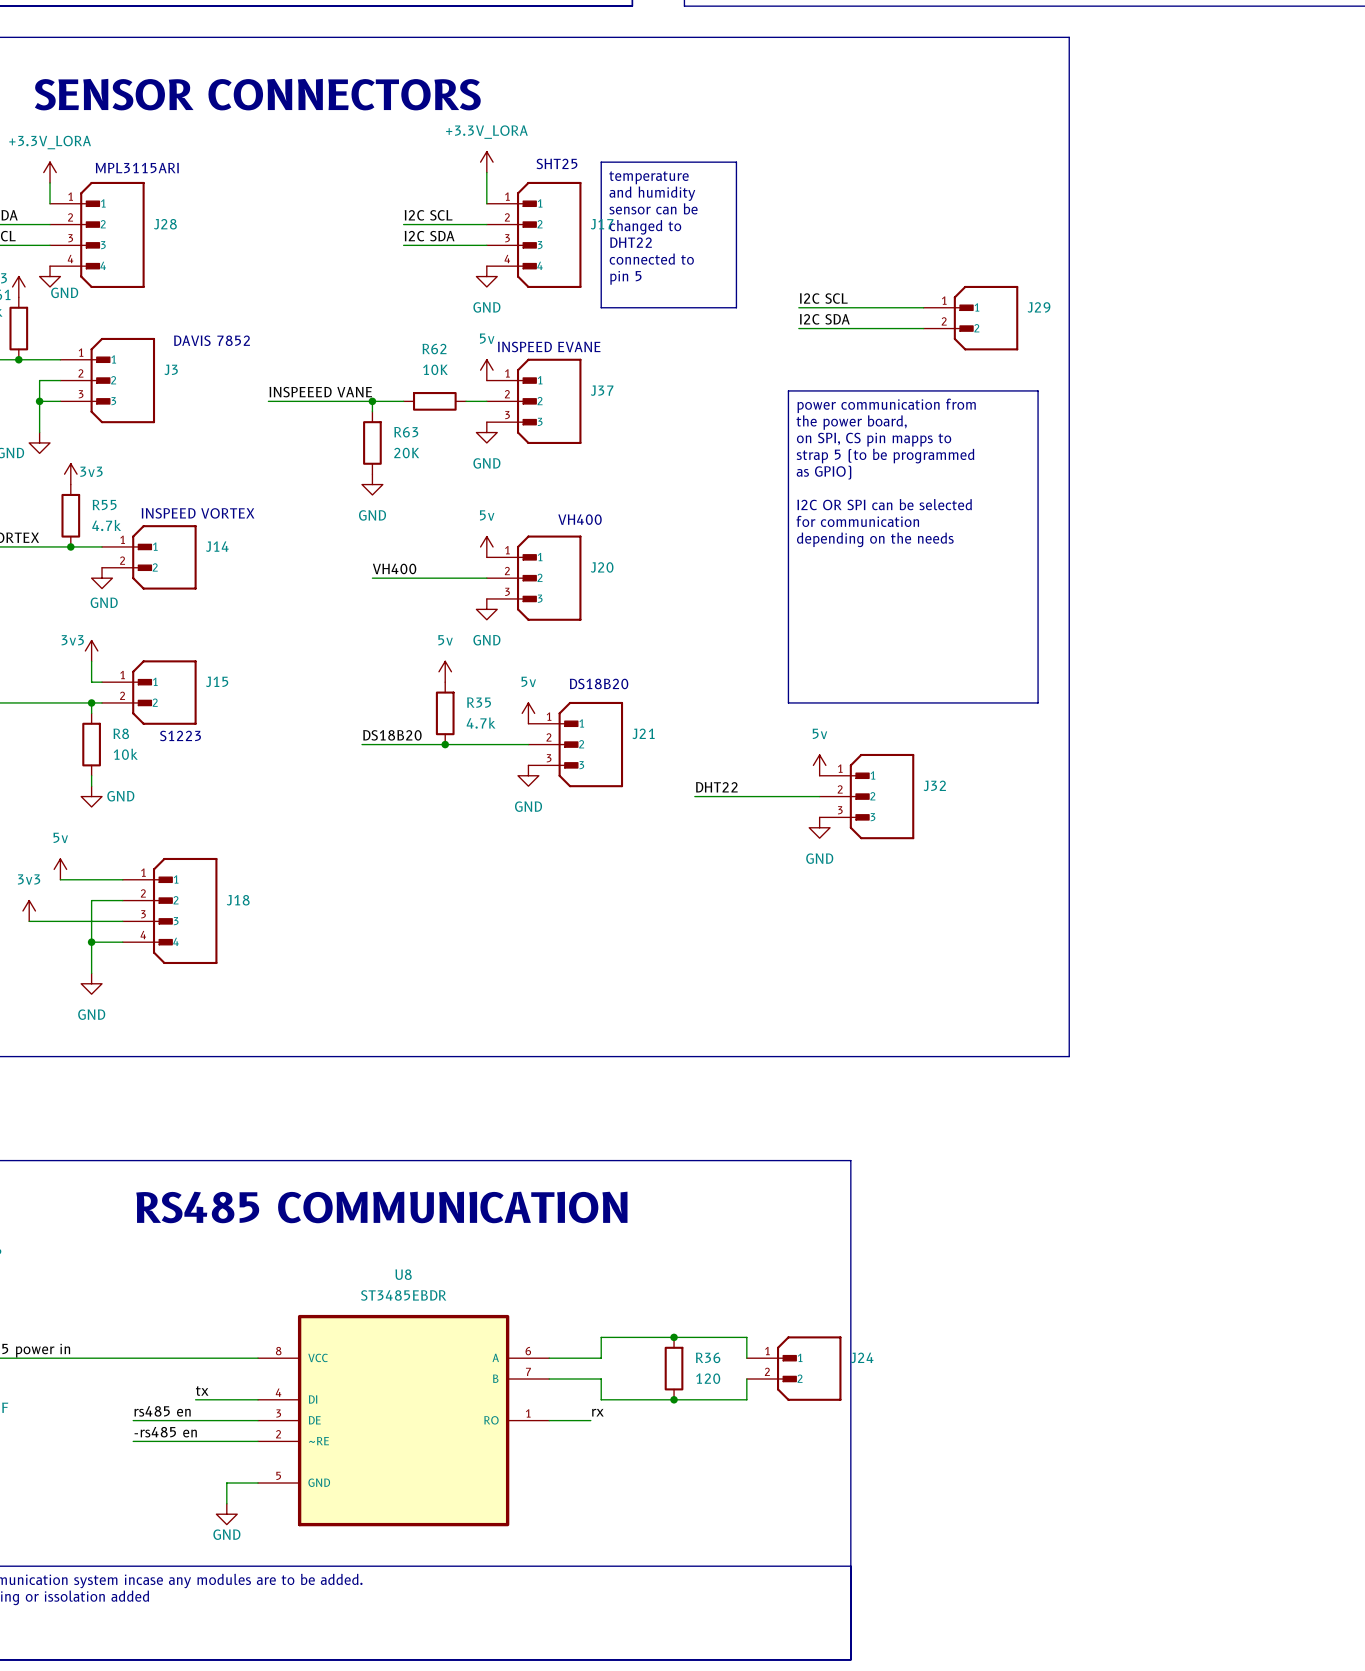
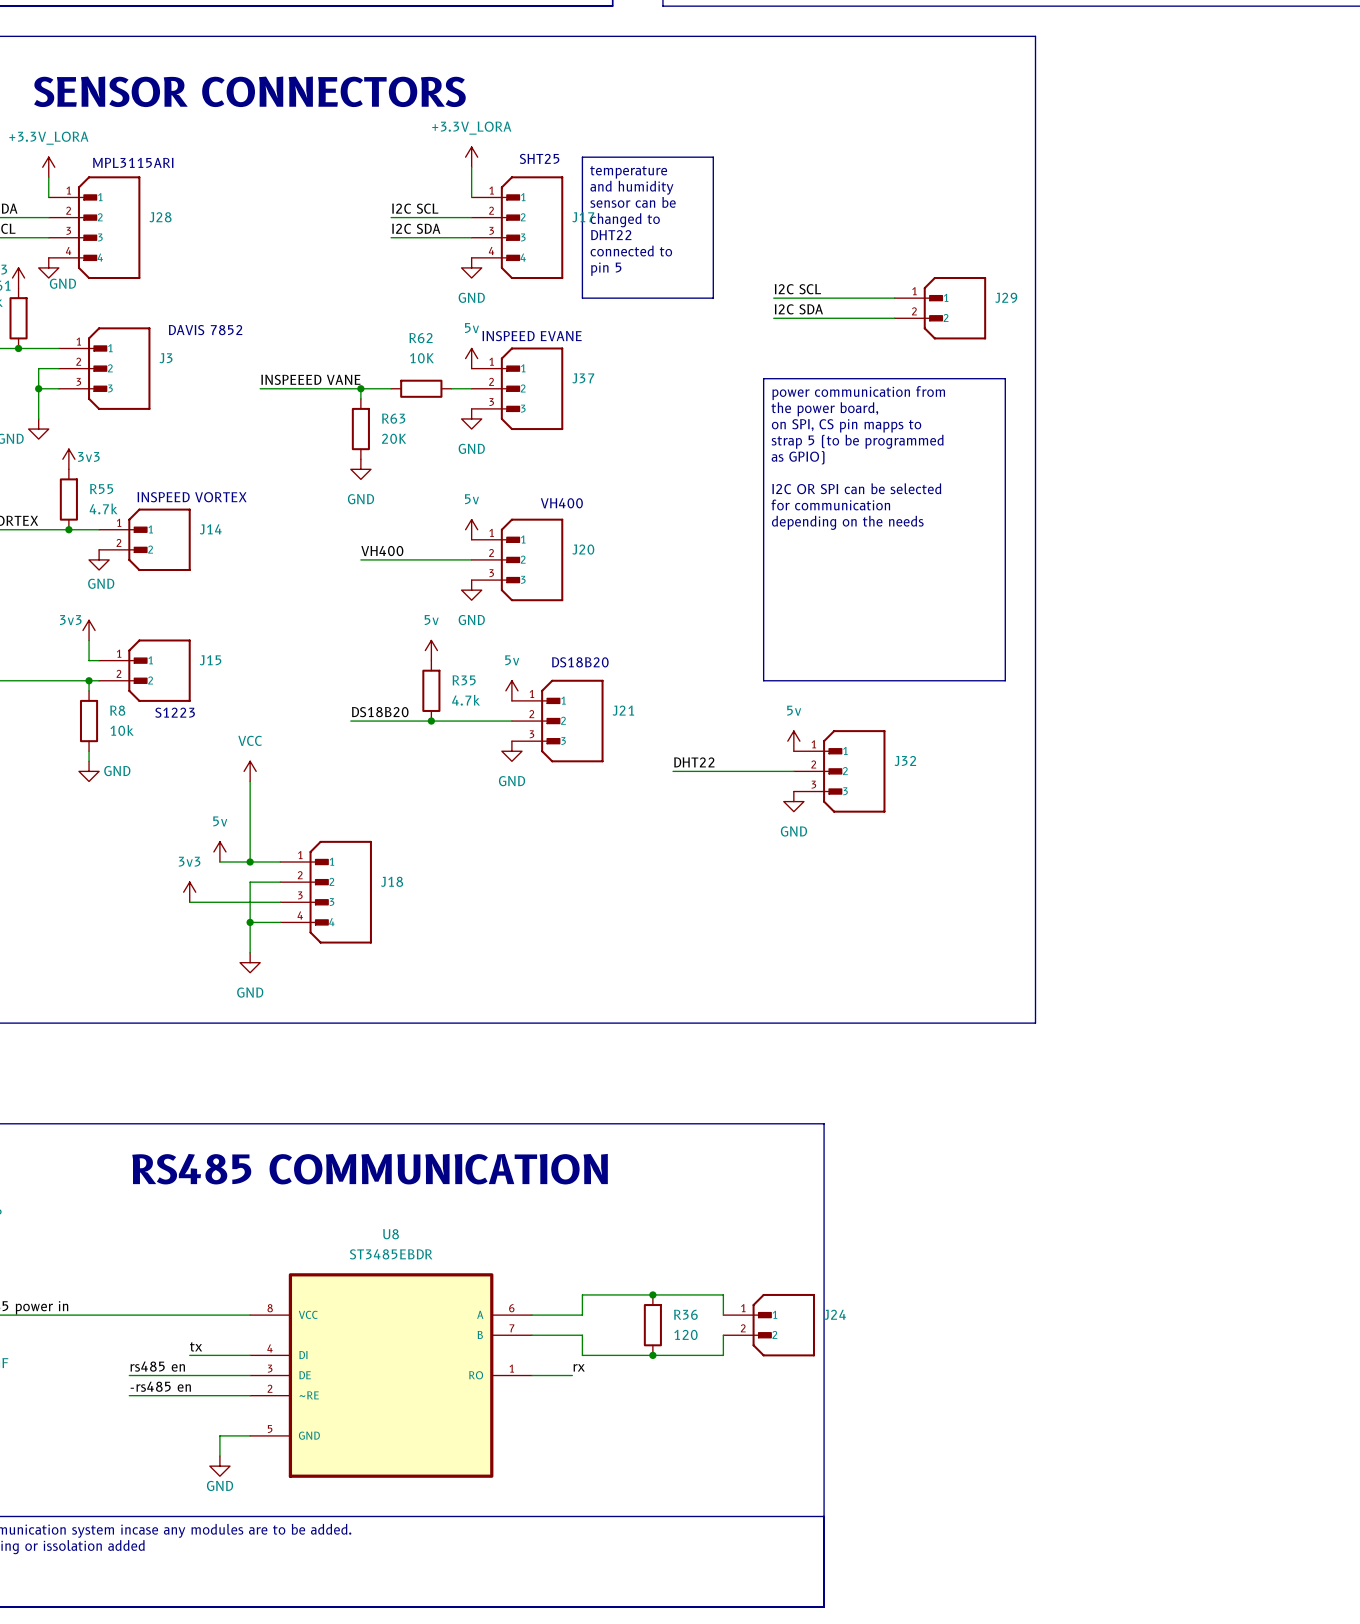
power symbol: none -> VCC (250, 771)
wire: none -> (250, 781) (250, 862)
power symbol position: 5v (60, 869) -> 5v (219, 851)
wire: (60, 879) (122, 879) -> (219, 862) (280, 862)
junction: none -> (250, 862)
wire: (122, 900) (91, 900) (91, 973) -> (280, 882) (250, 882) (250, 952)
power symbol position: 3v3 (29, 910) -> 3v3 (189, 892)
J18 position: (170, 910) -> (326, 892)
wire: (29, 921) (122, 921) -> (189, 902) (280, 902)
wire: (91, 942) (122, 942) -> (250, 922) (280, 922)
junction: (91, 942) -> none
junction: none -> (250, 922)
power symbol position: GND (91, 983) -> GND (250, 962)

